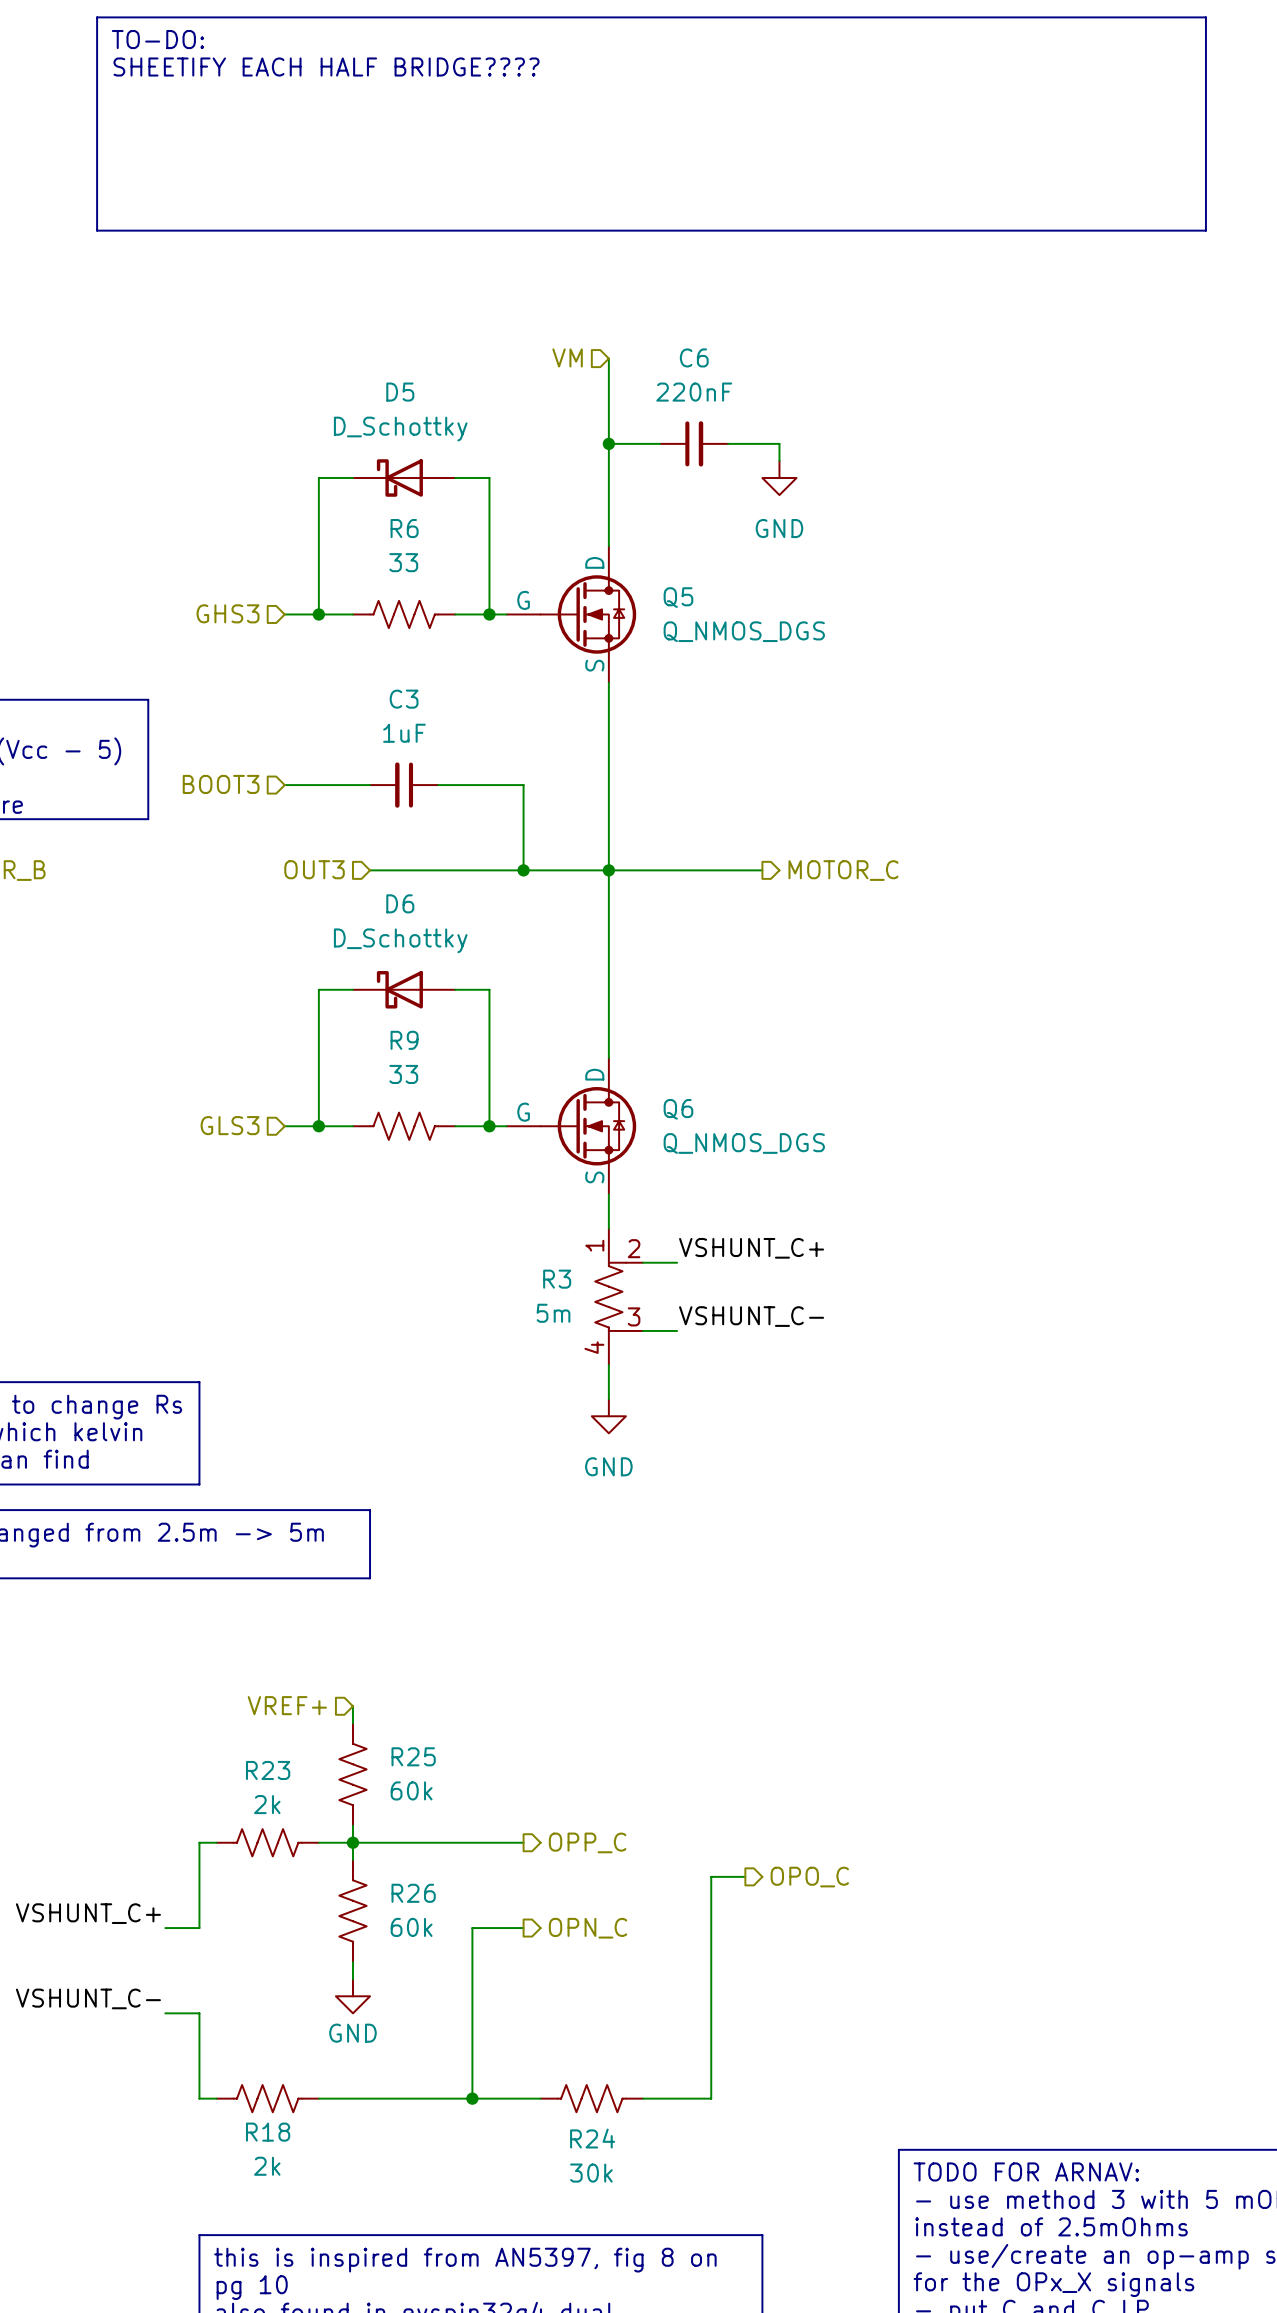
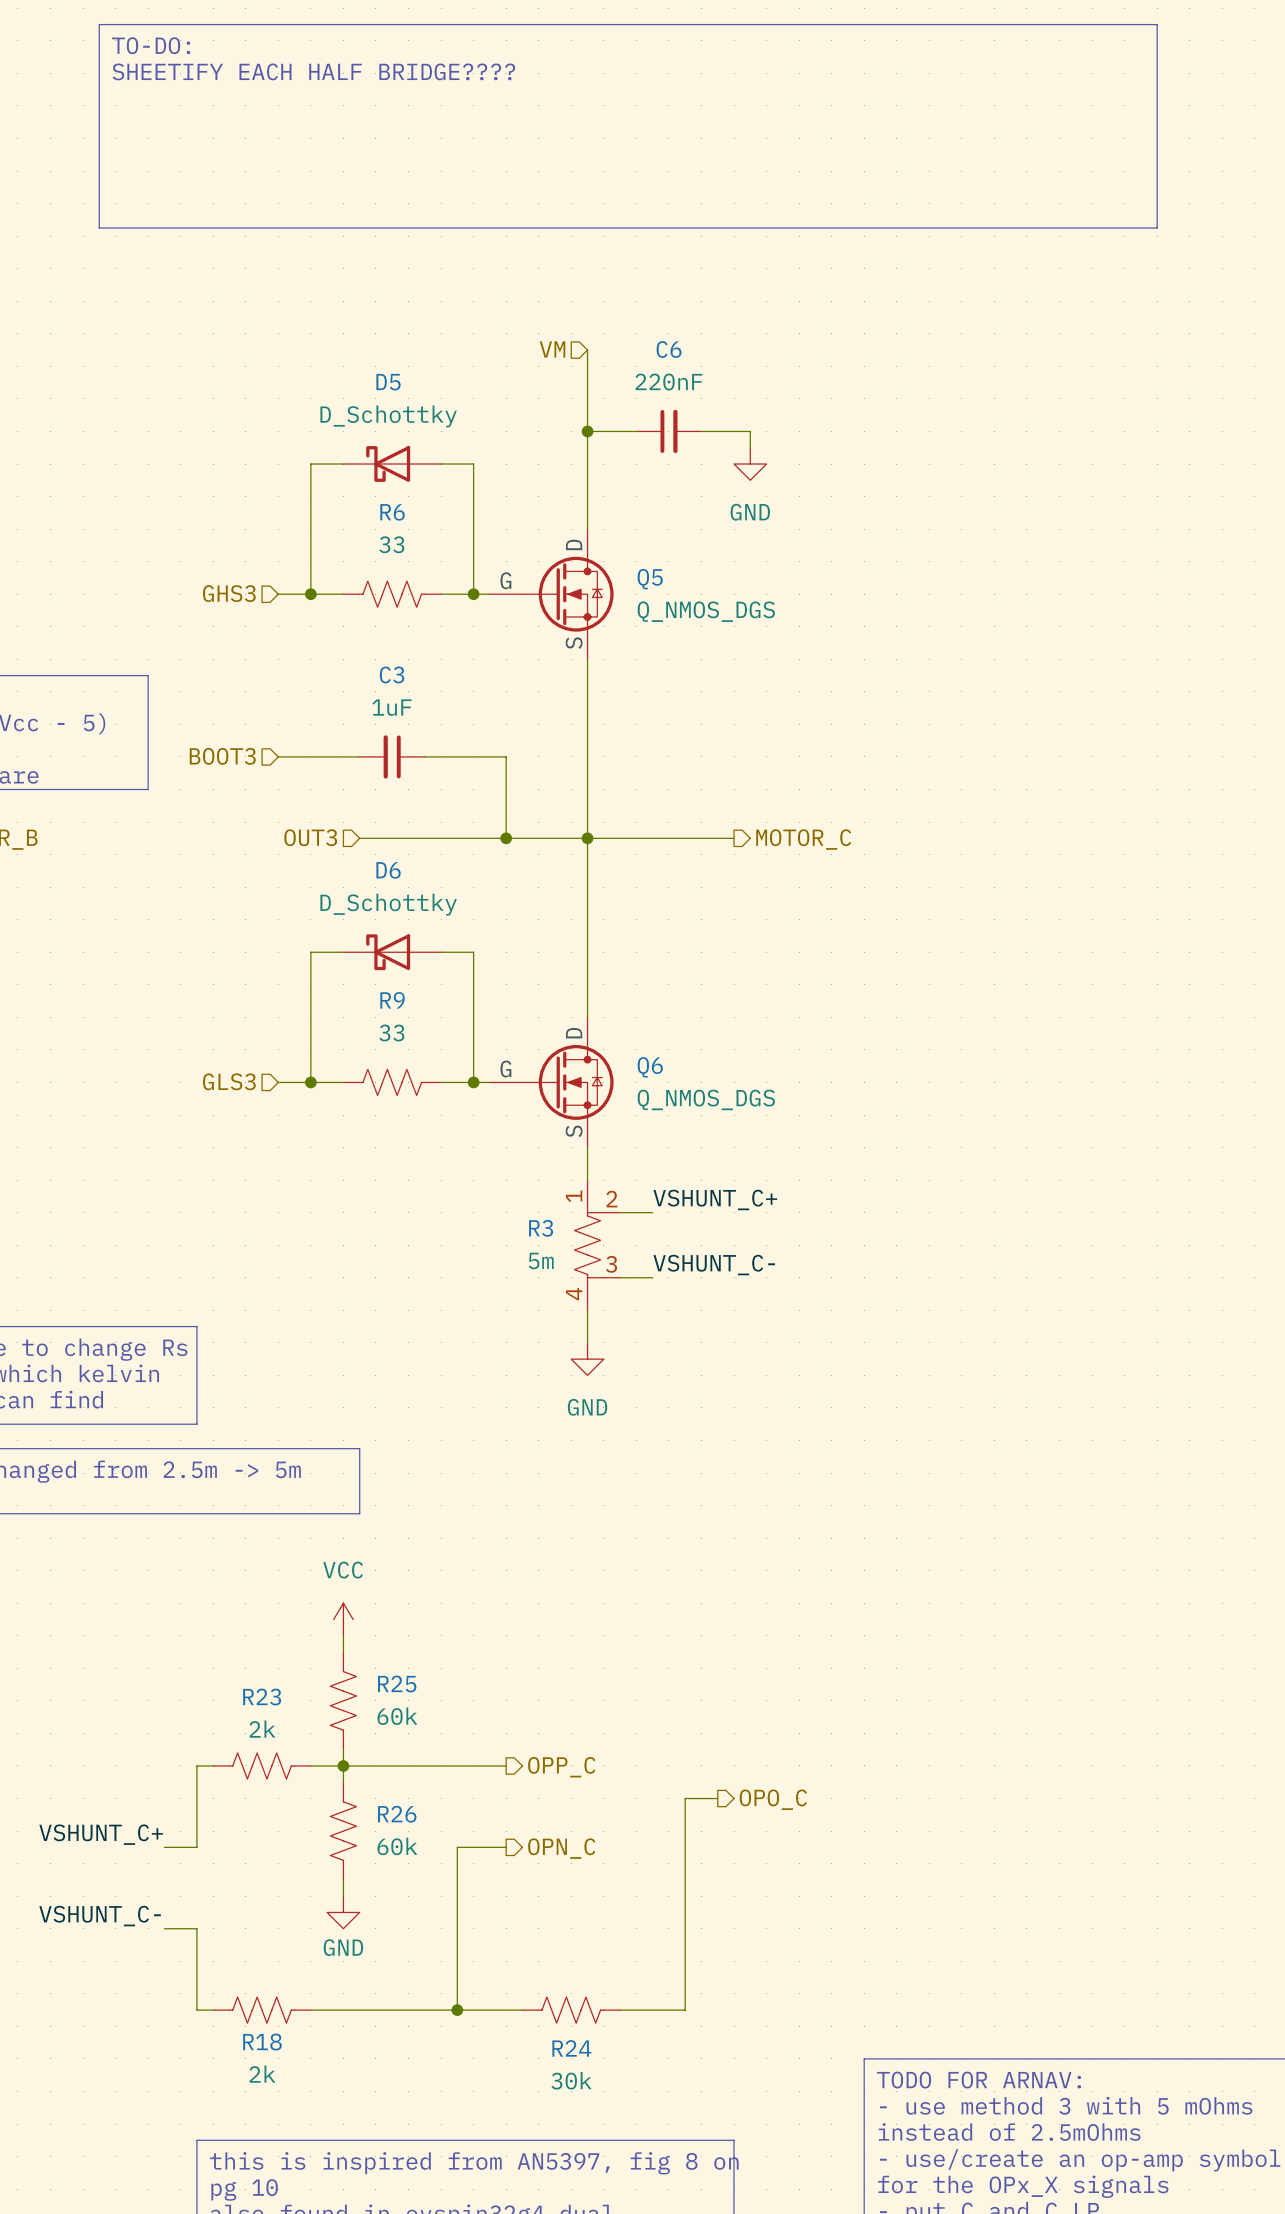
power symbol: none -> VCC (343, 1619)
hierarchical label: VREF+ (287, 1705) -> none

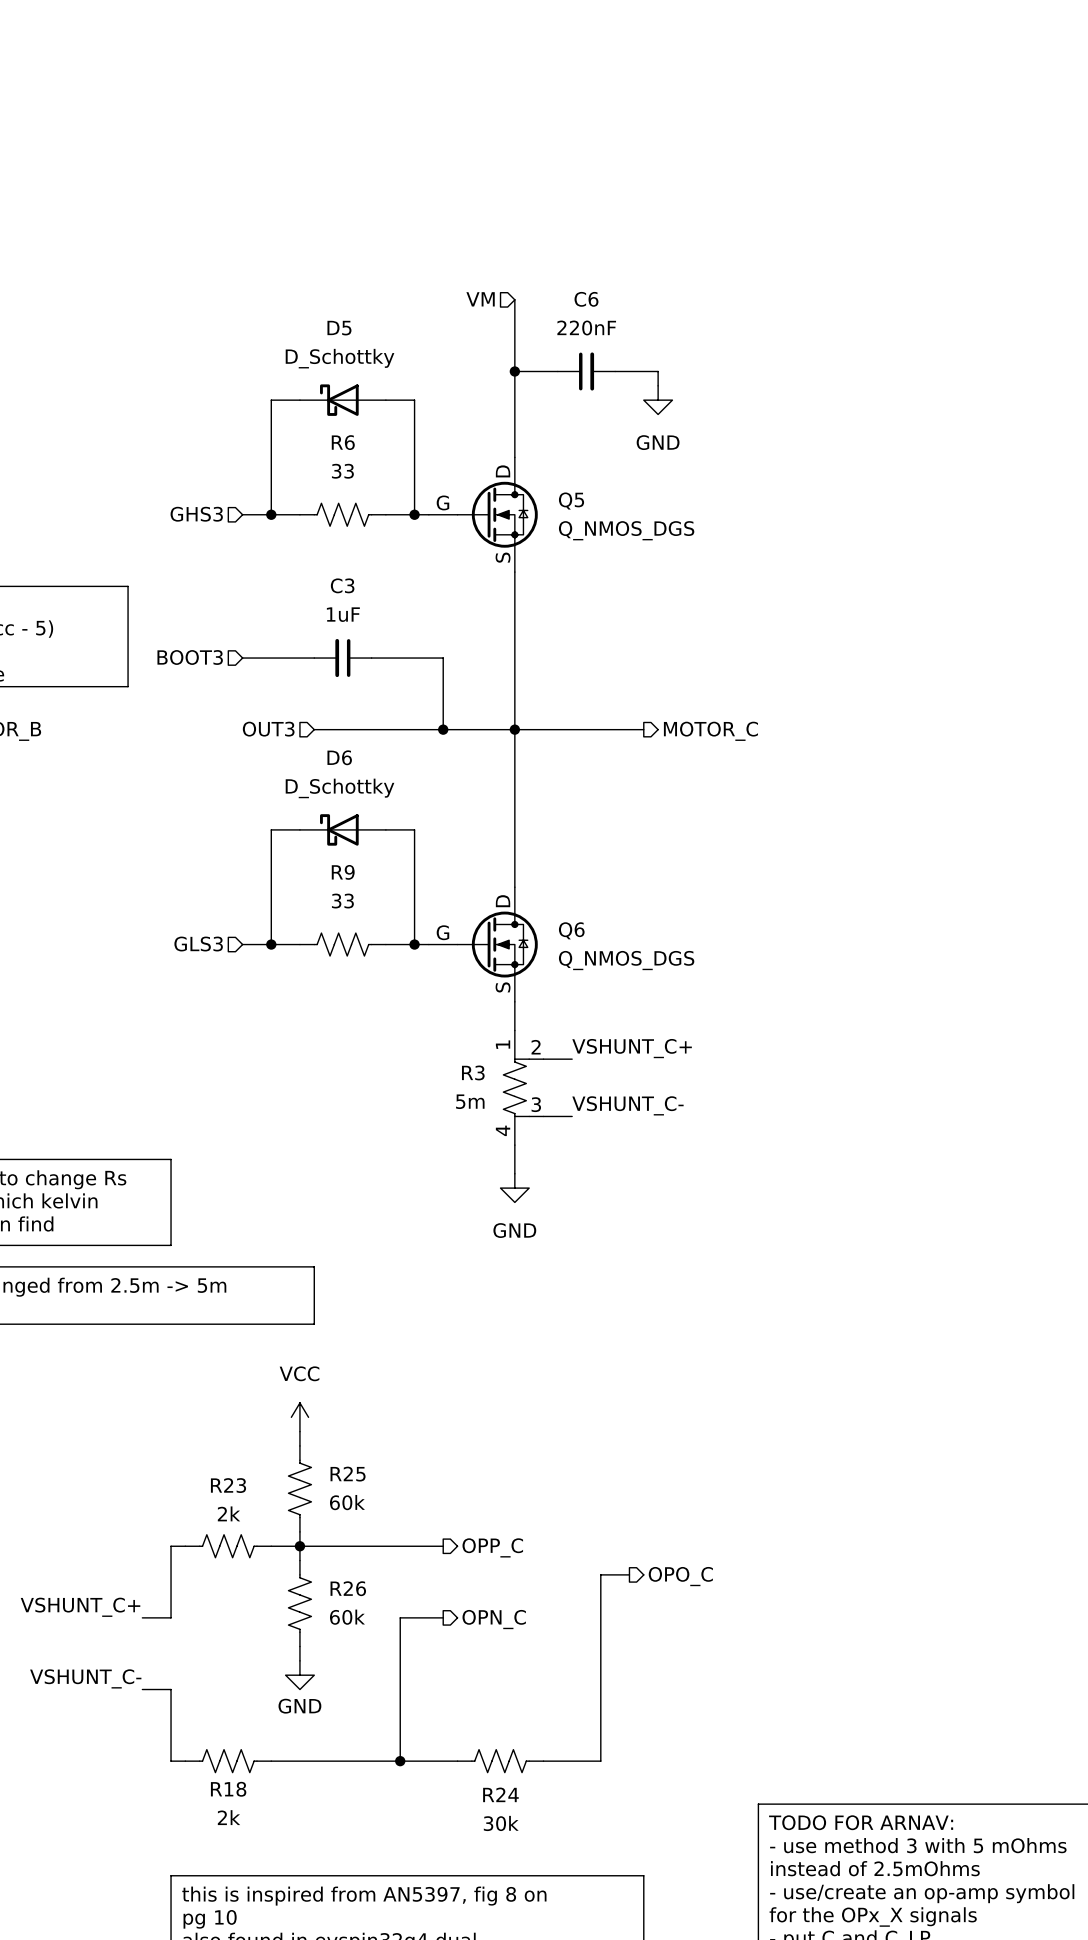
line: (99, 24) (1157, 24) (1157, 228) (99, 228) (99, 24) -> none
text: TO-DO: (151, 45) -> none
text: SHEETIFY EACH HALF BRIDGE???? (313, 71) -> none

